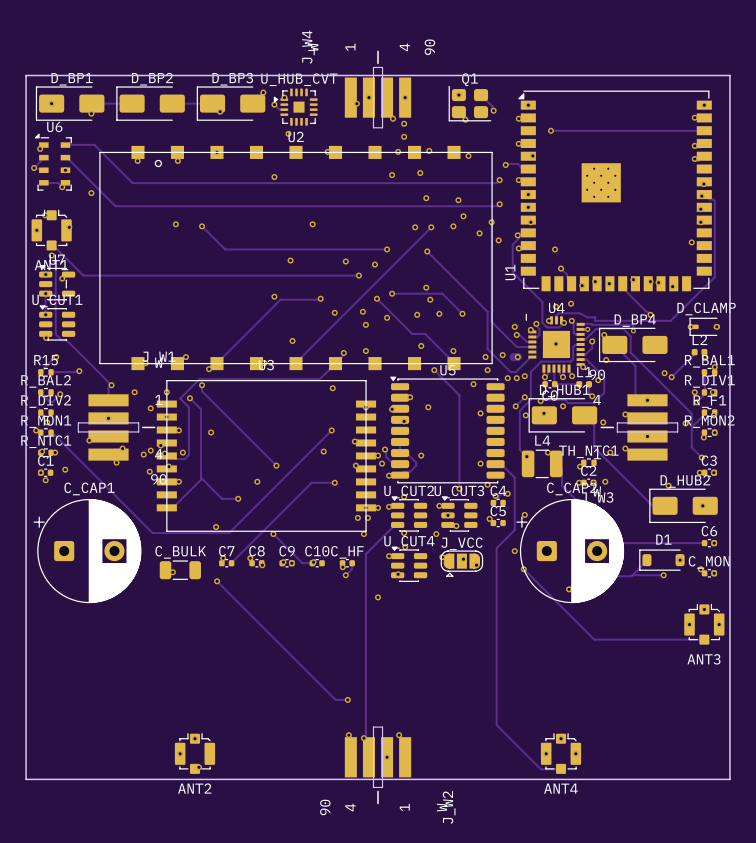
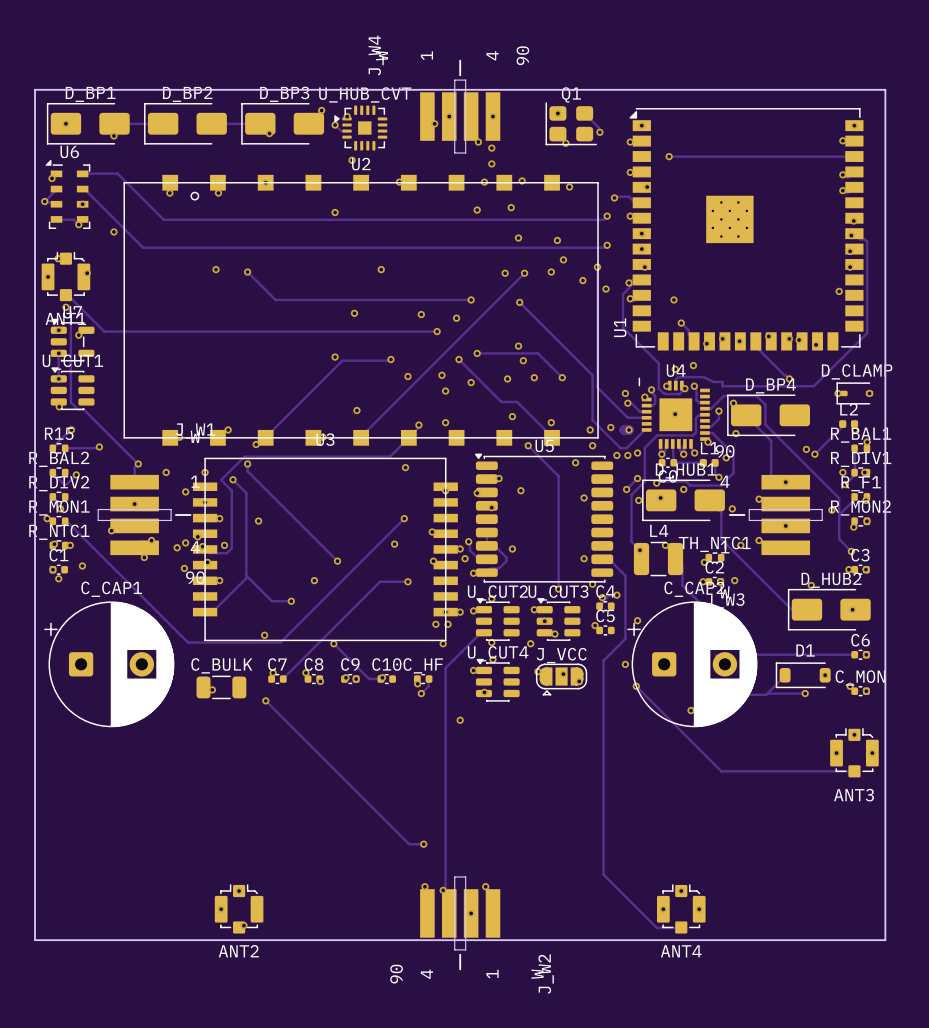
track: (580, 323) (633, 324) (633, 330) -> none
via: (587, 329) -> none
via: (633, 330) -> none

